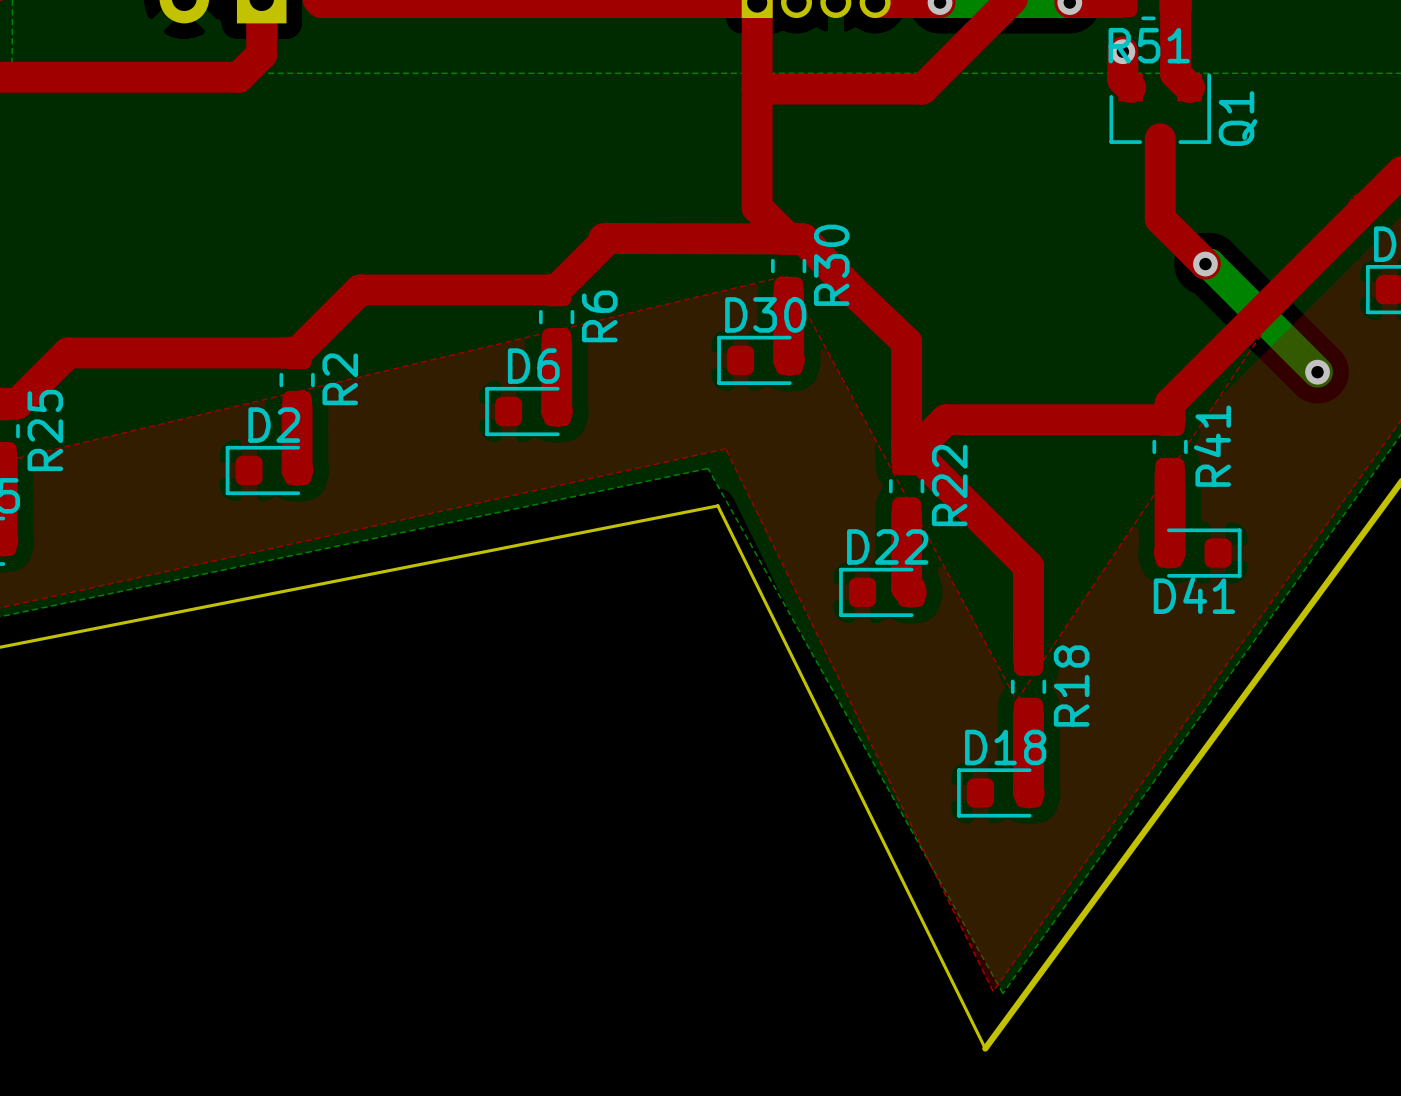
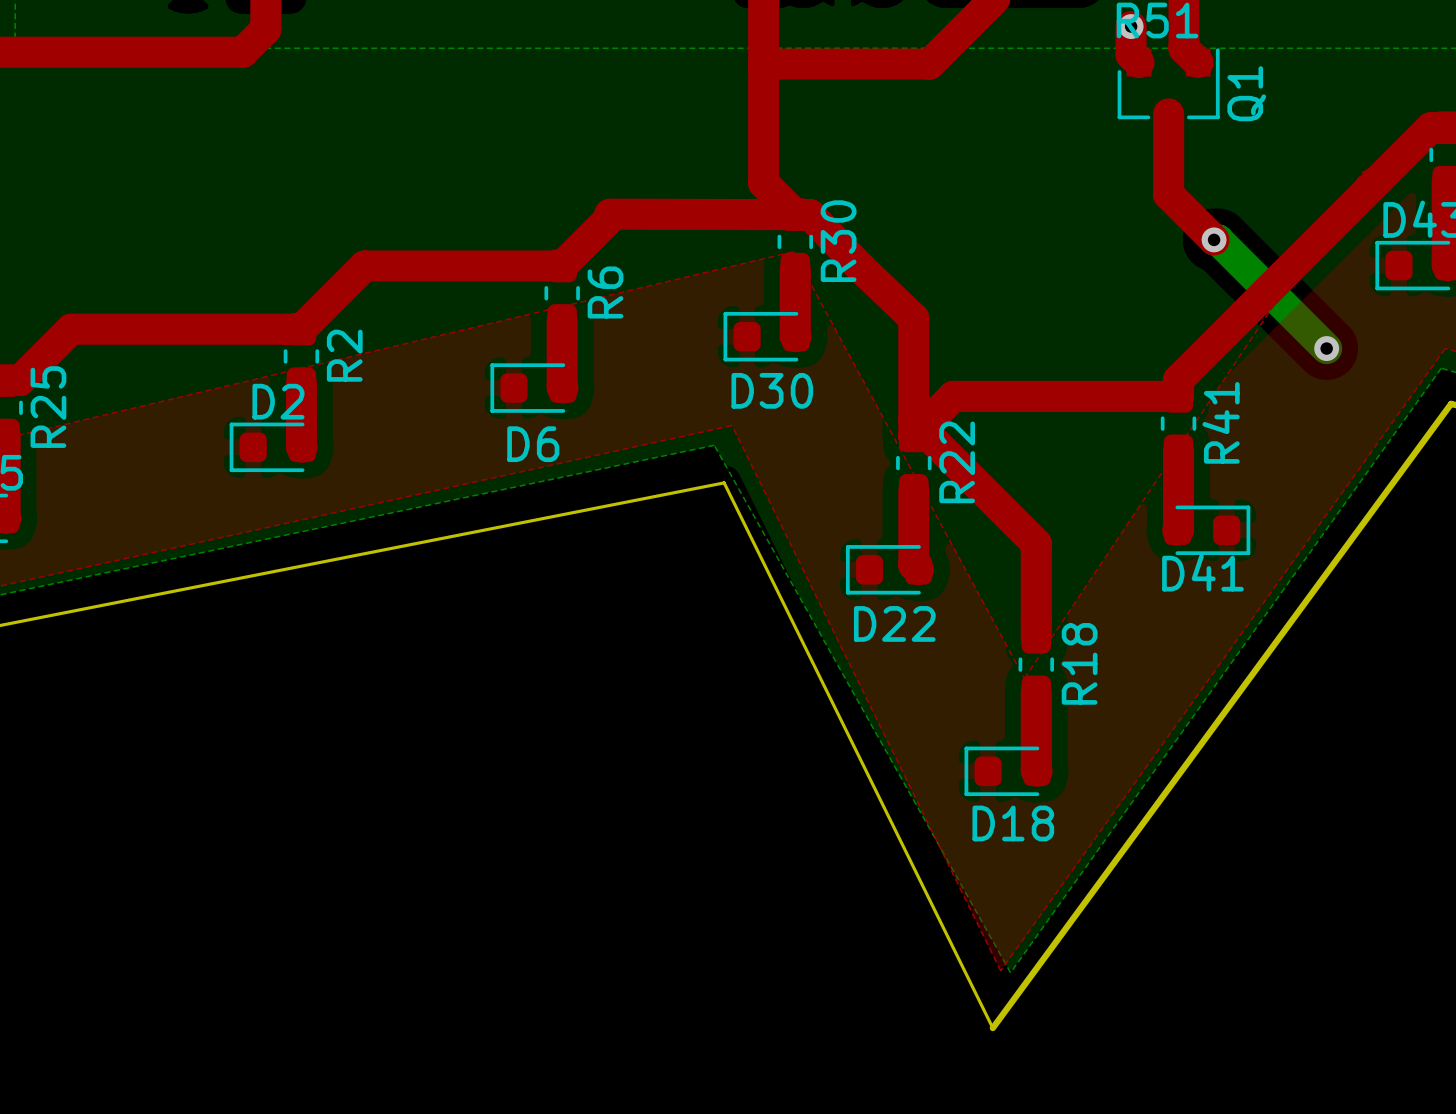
D30 name position: D30 (765, 314) -> D30 (772, 390)
D6 name position: D6 (533, 366) -> D6 (533, 444)
D22 name position: D22 (887, 546) -> D22 (894, 623)
D18 name position: D18 (1005, 747) -> D18 (1013, 823)

